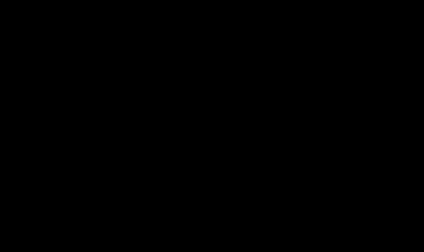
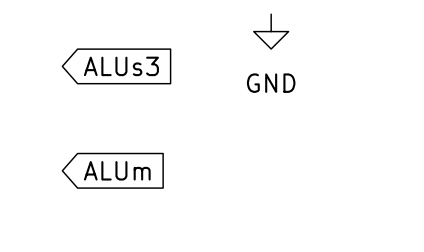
power symbol: none -> GND (271, 31)
global label: none -> ALUs3 (121, 66)
global label: none -> ALUm (117, 170)

